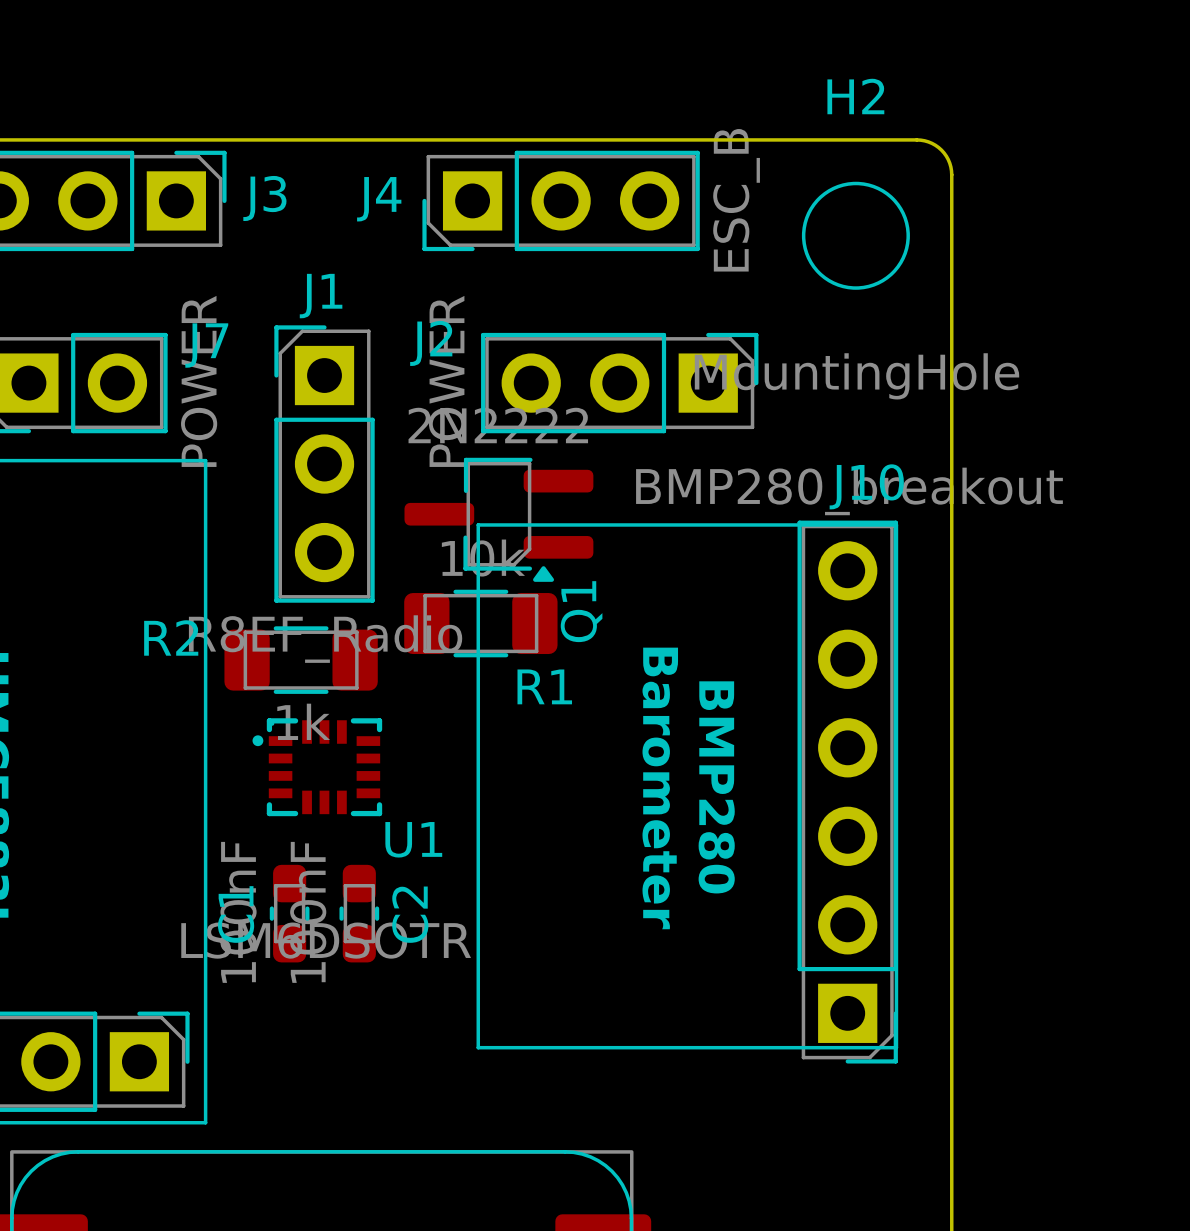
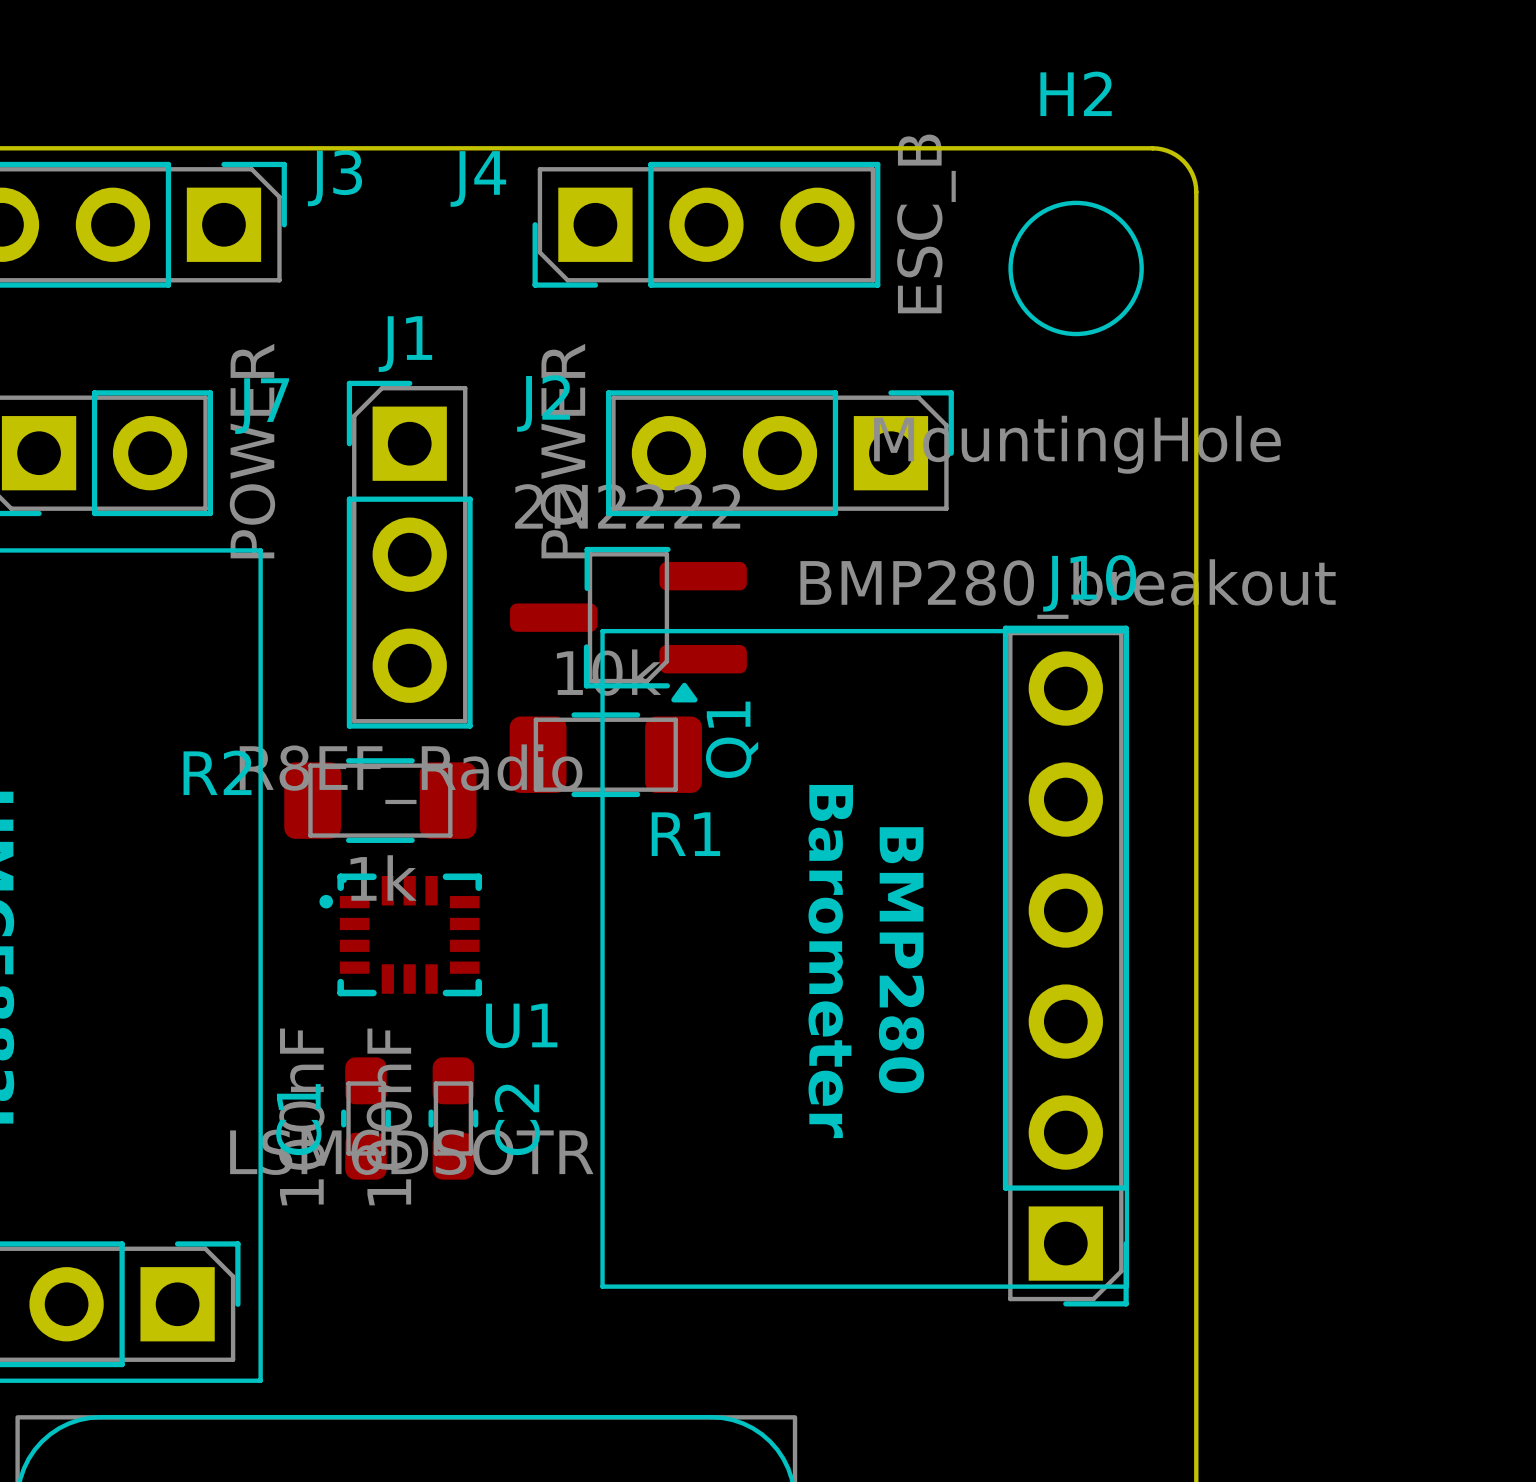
J3 name position: J3 (264, 198) -> J3 (334, 178)
J4 name position: J4 (379, 199) -> J4 (478, 178)

